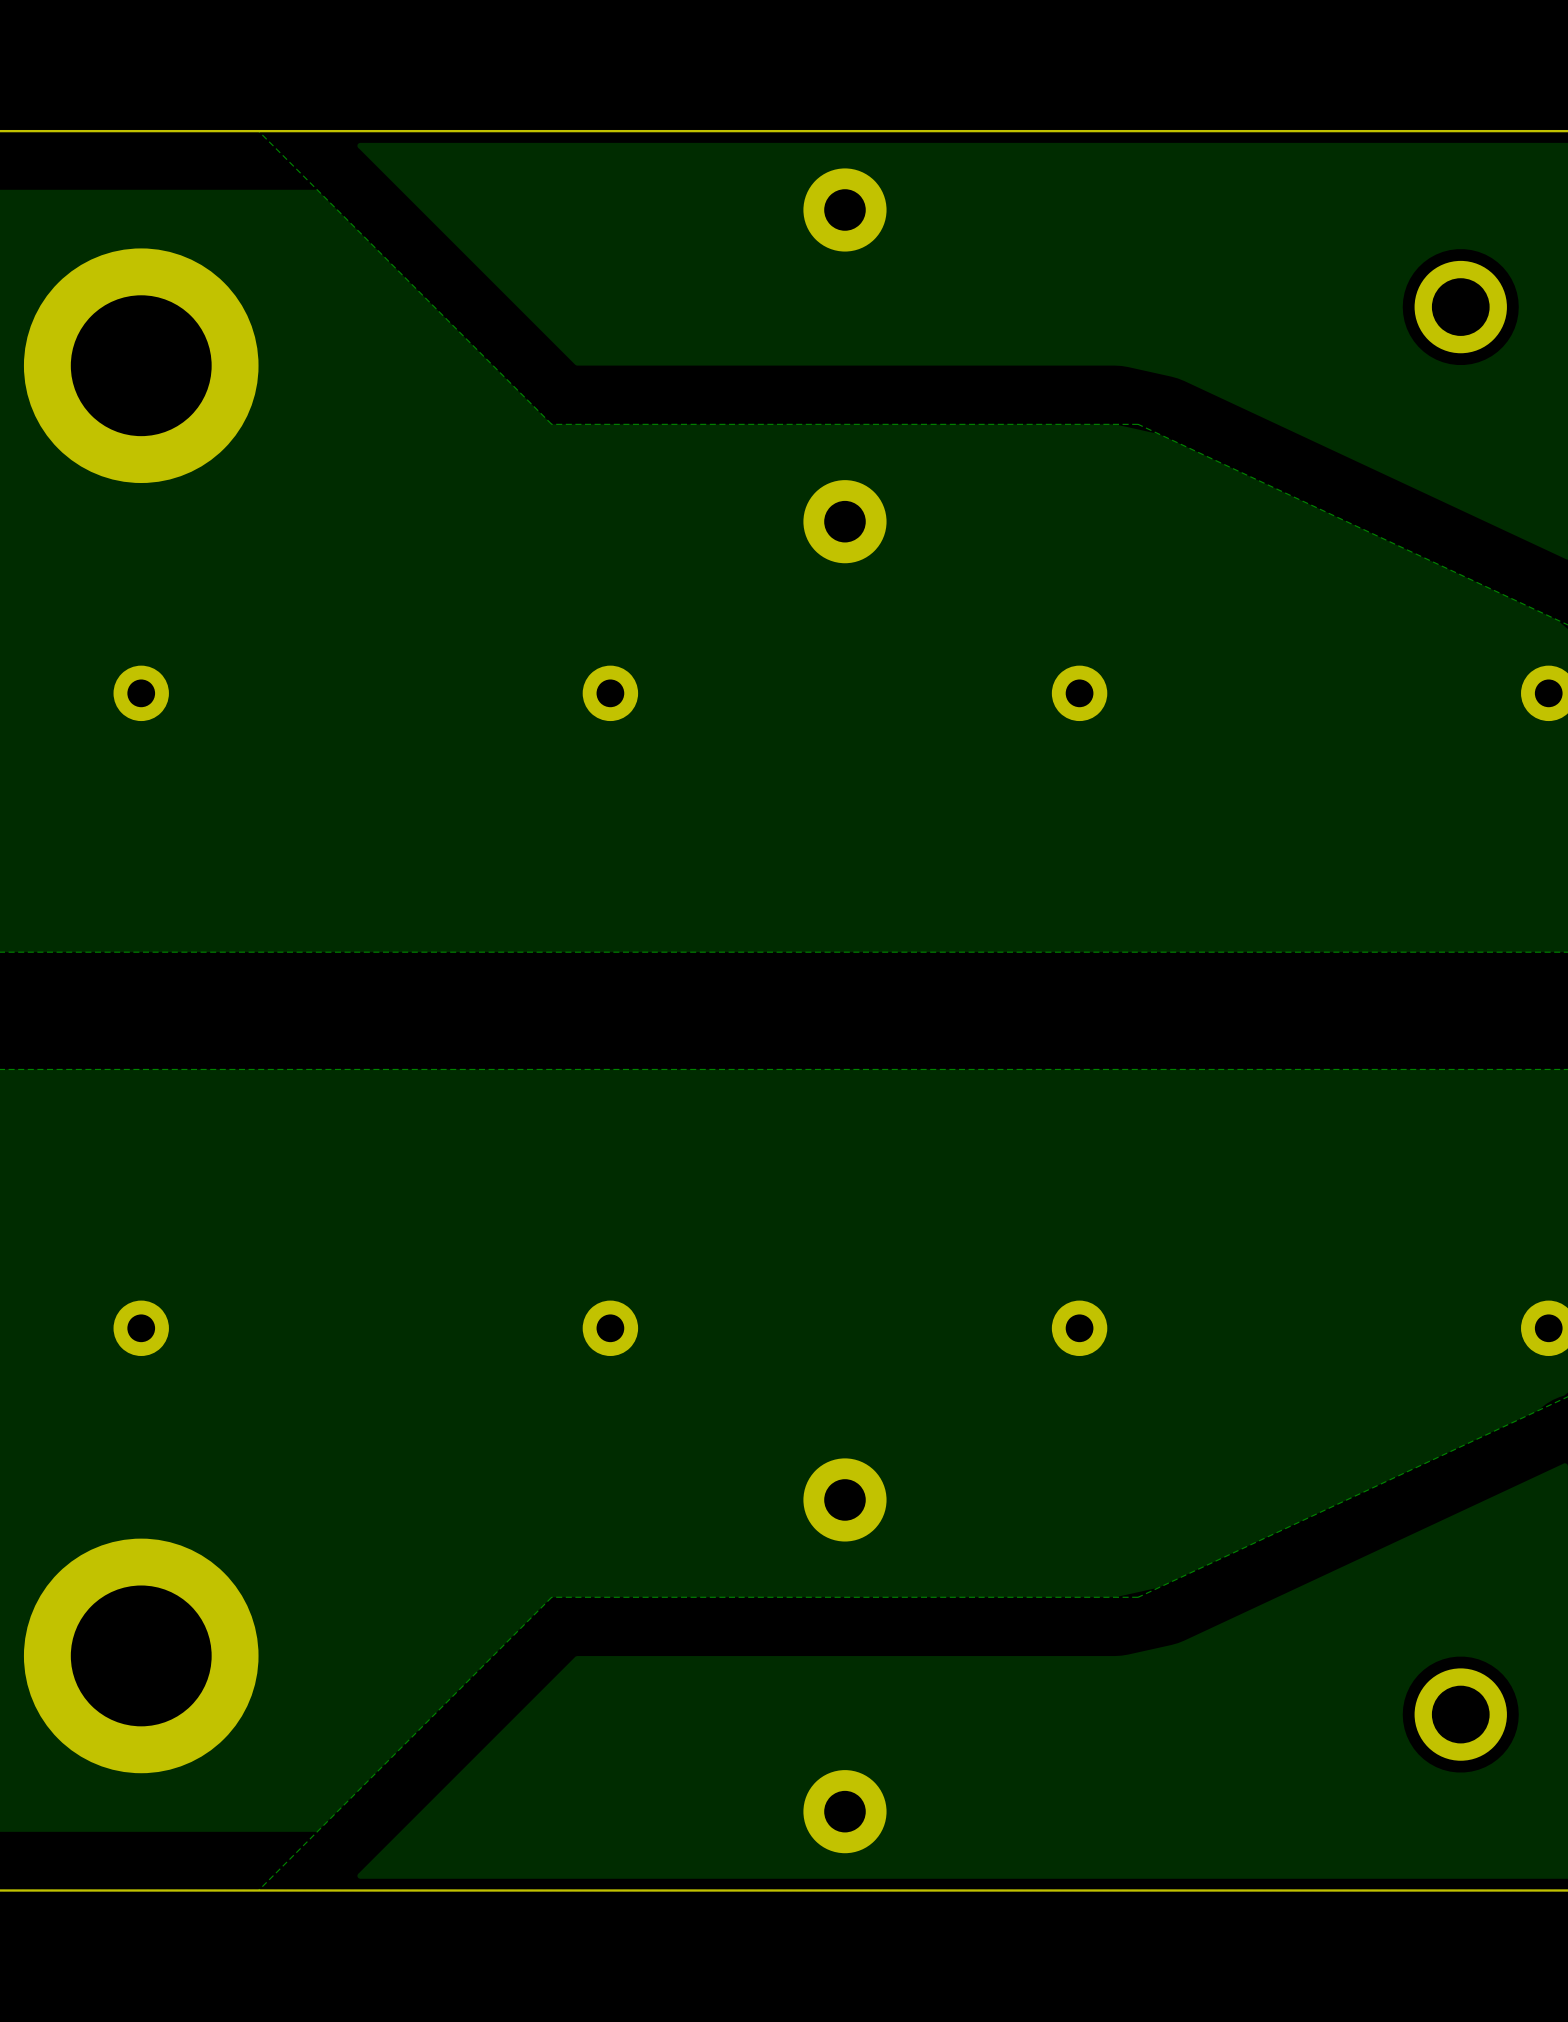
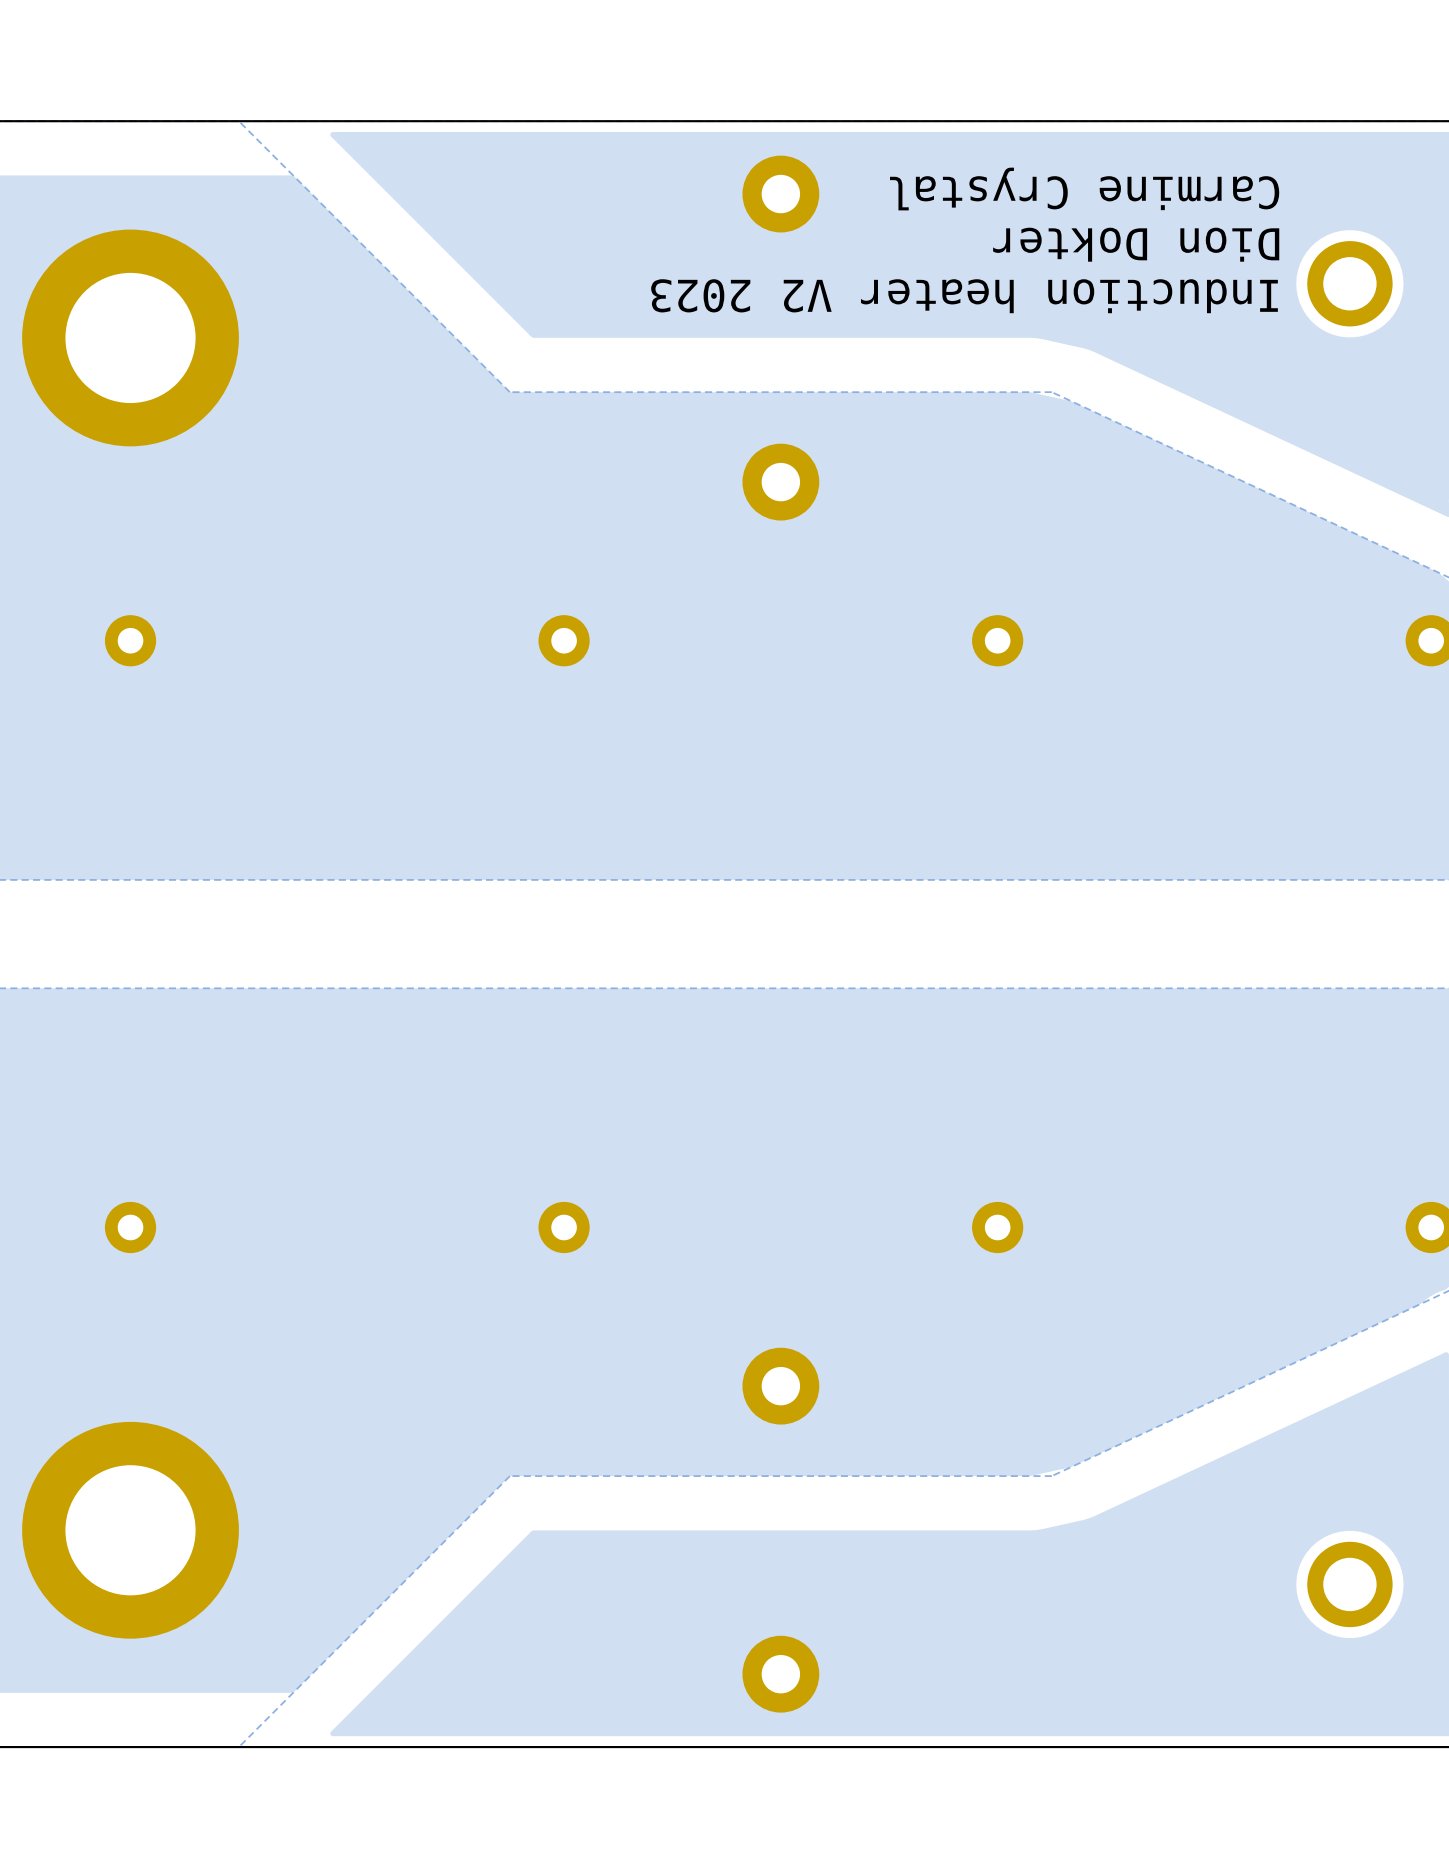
text: none -> Carmine Crystal (1084, 189)
text: none -> Dion Dokter (1136, 244)
text: none -> Induction heater V2 2023 (964, 296)

